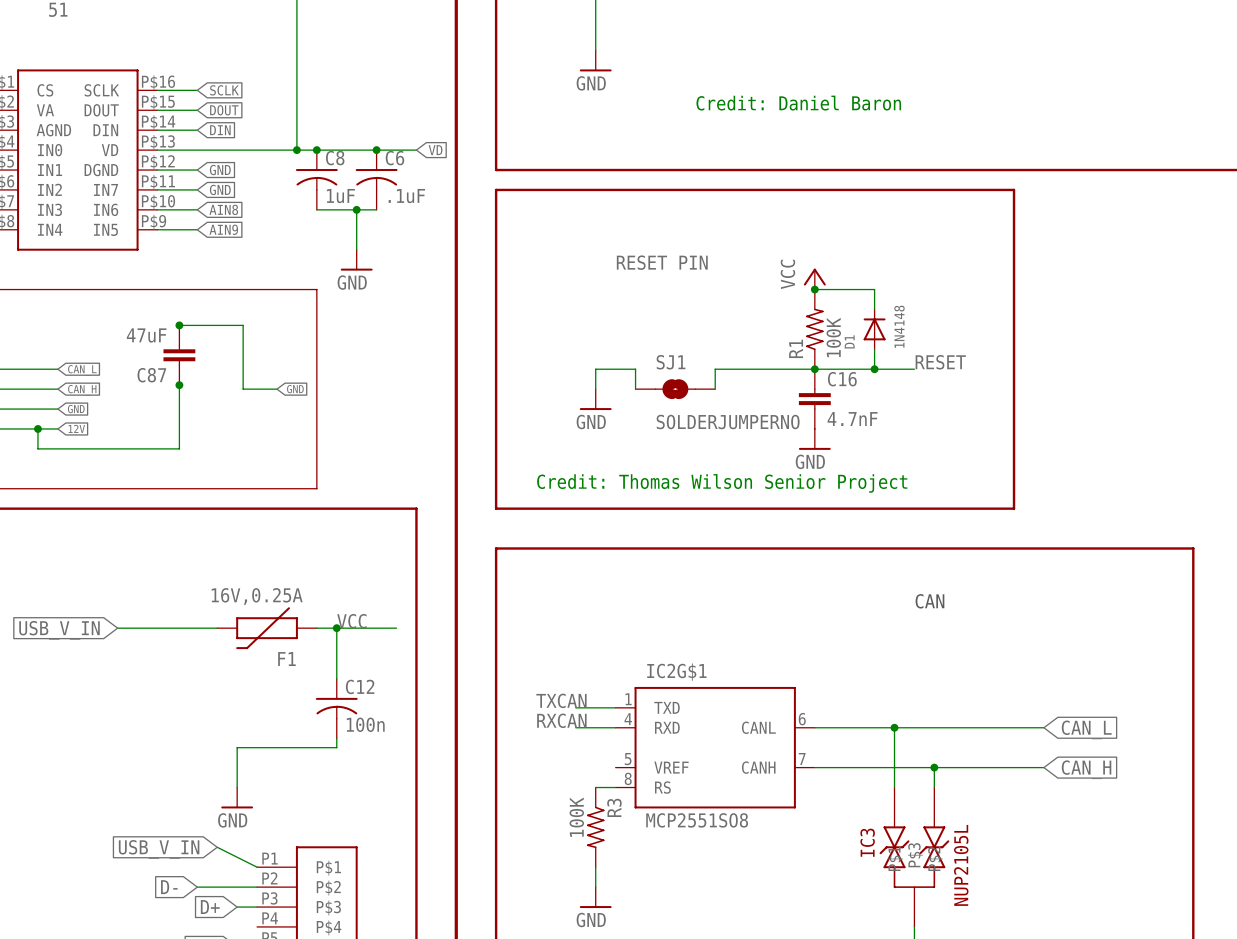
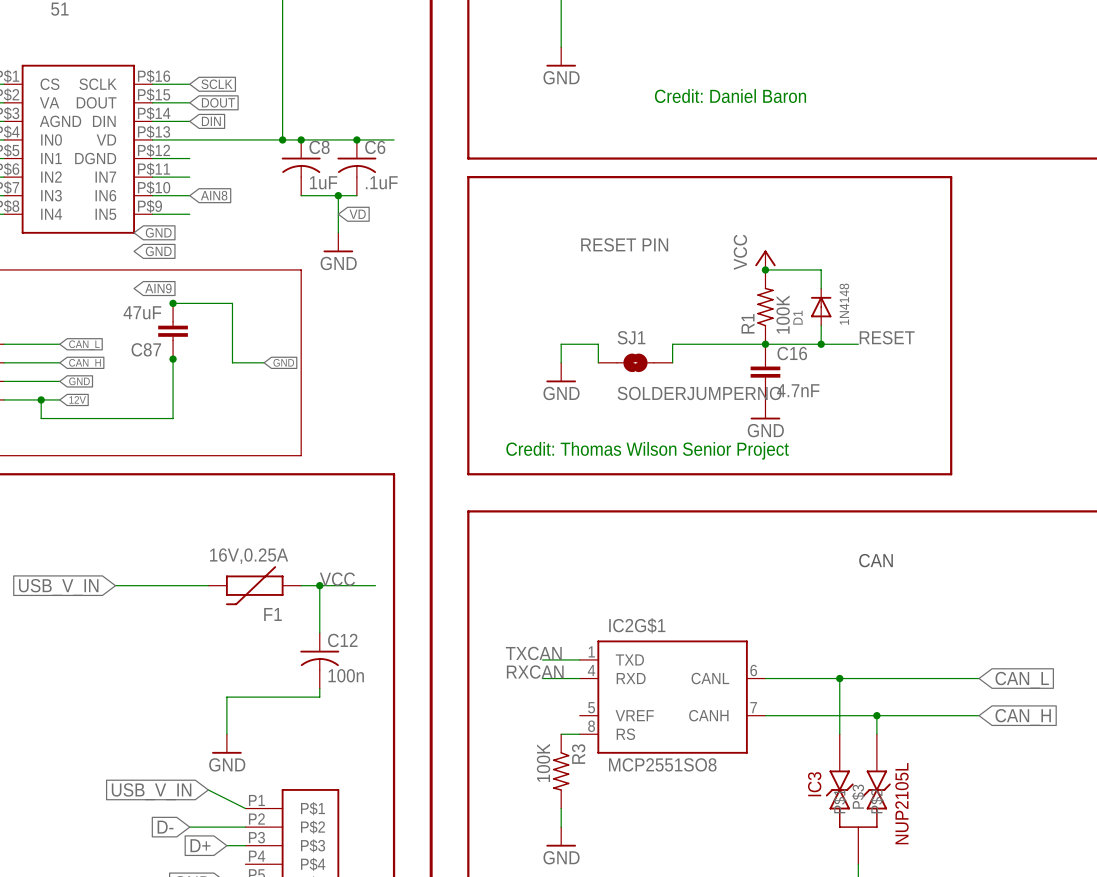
global label position: VD (435, 150) -> VD (357, 214)
global label: GND (220, 170) -> none
global label: GND (220, 189) -> none
global label position: AIN9 (223, 229) -> AIN9 (158, 288)
global label: none -> GND (158, 232)
global label: none -> GND (158, 251)

